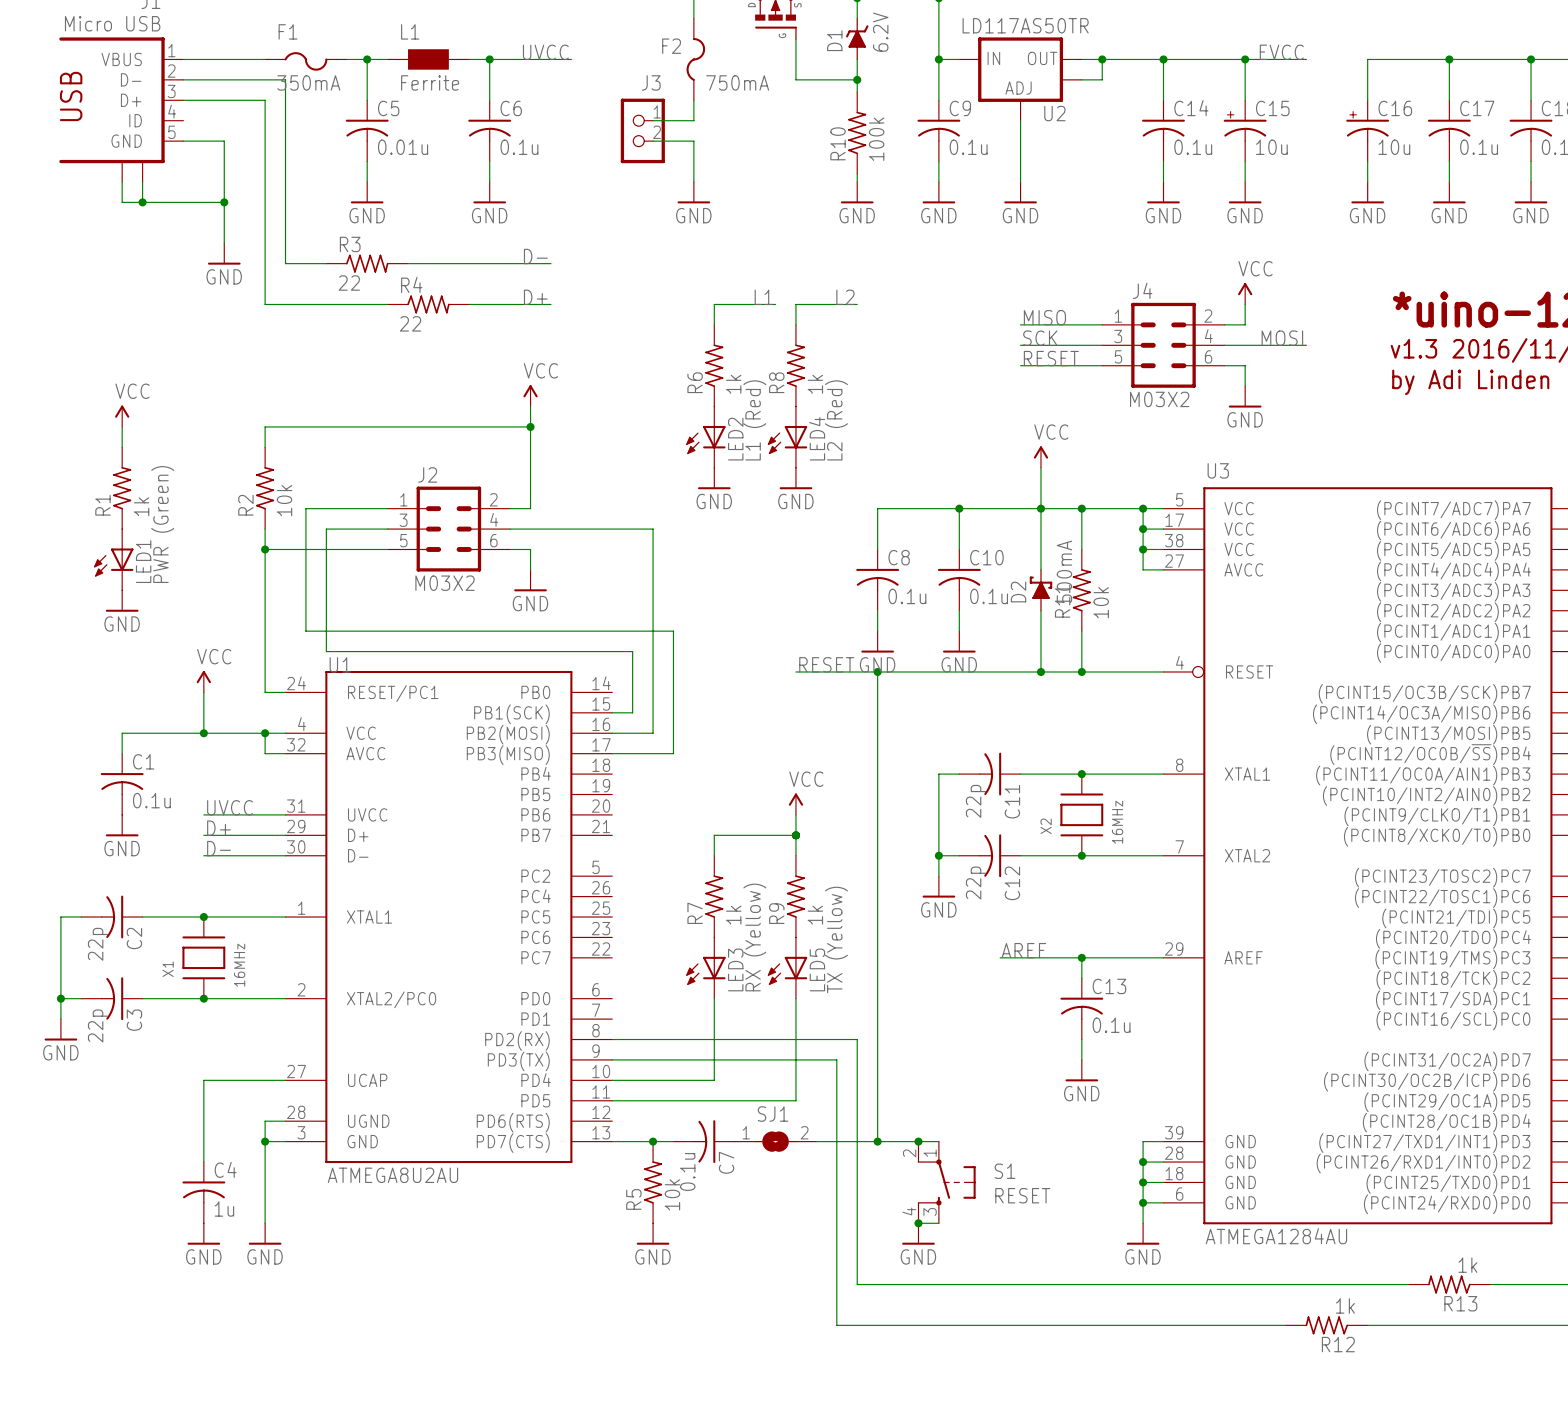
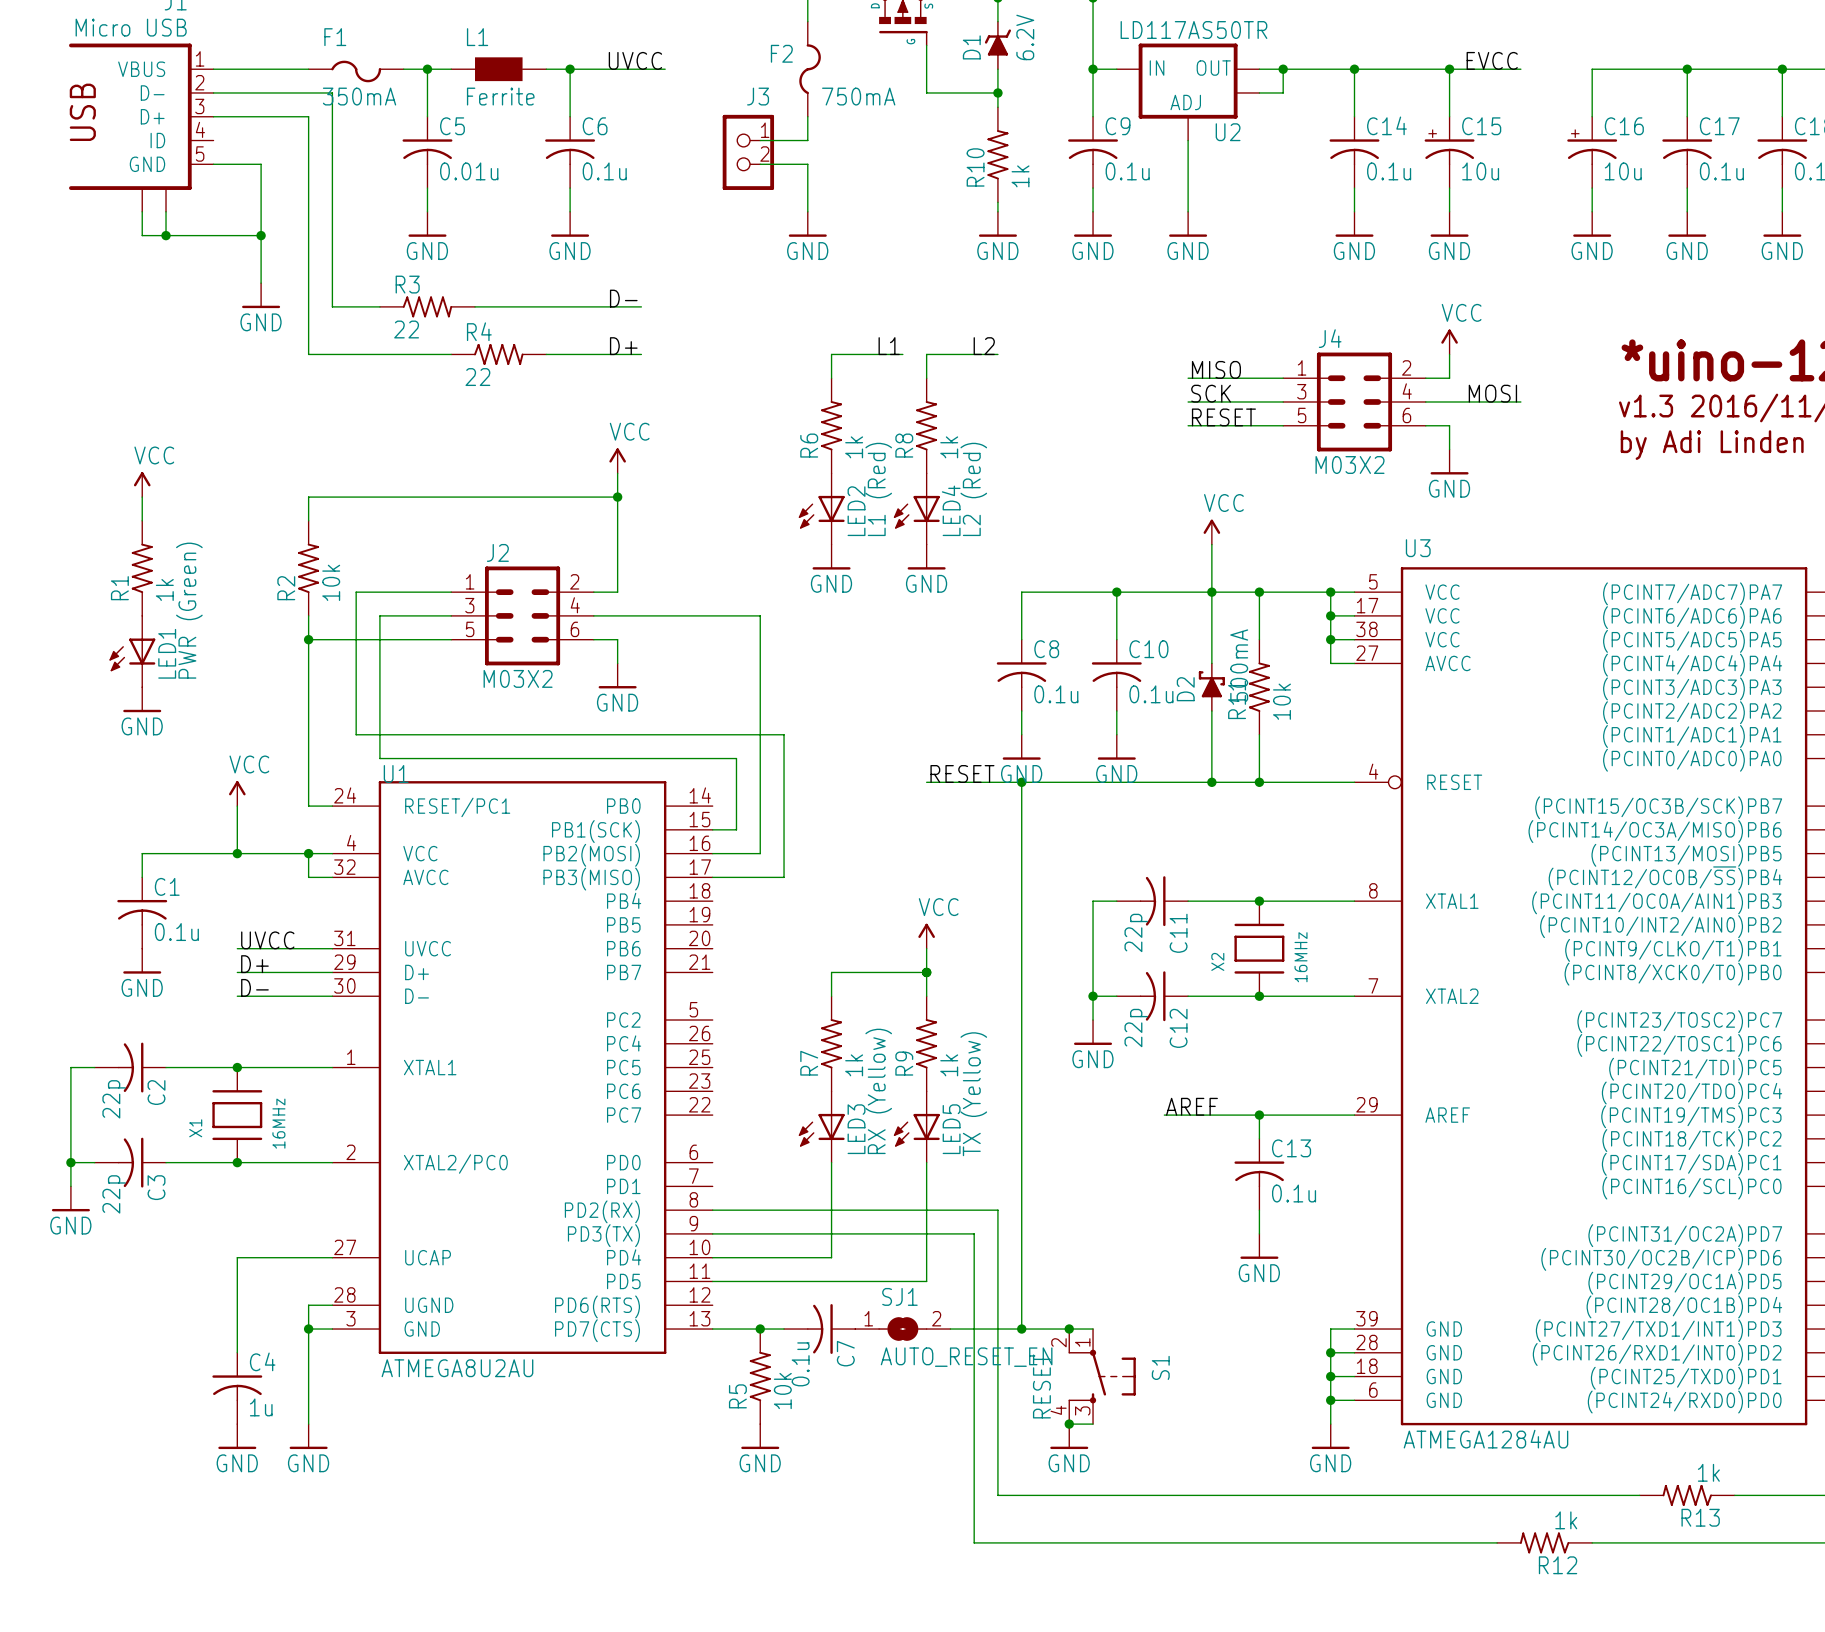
R10 value: 100k (876, 139) -> 1k (1020, 176)
SJ1 value: none -> AUTO_RESET_EN (966, 1357)
S1 name rotation: 0° (1004, 1171) -> 90° counterclockwise (1160, 1367)
S1 value rotation: 0° (1022, 1195) -> 90° counterclockwise (1041, 1386)
S1 value position: RESET (1022, 1195) -> RESET (1041, 1386)

